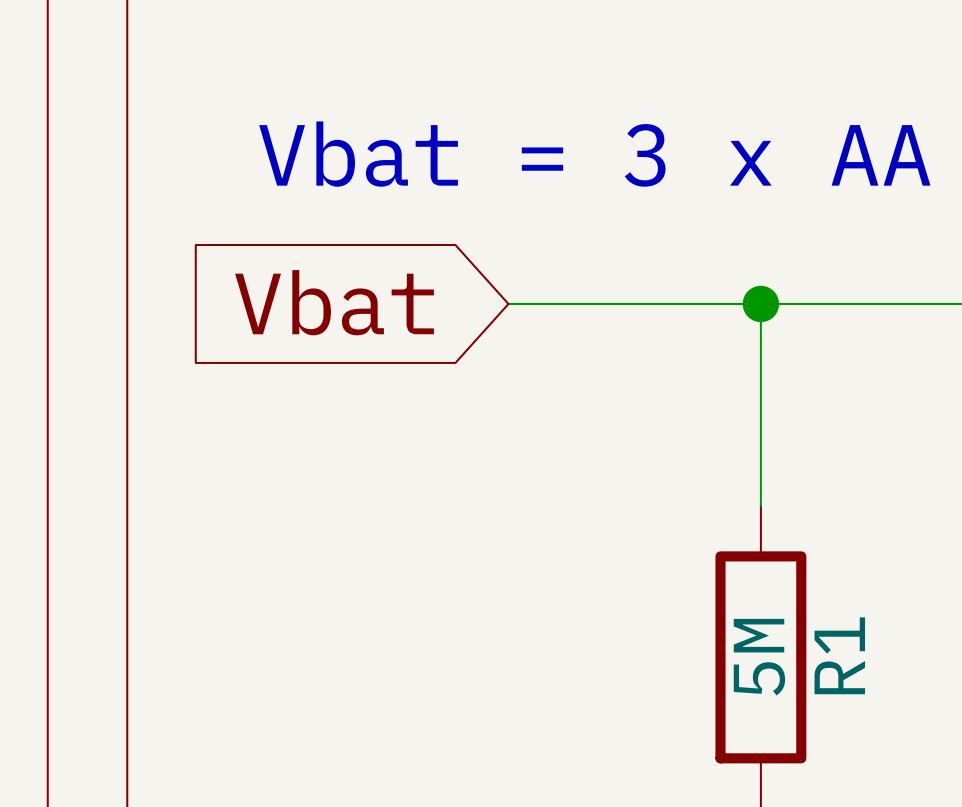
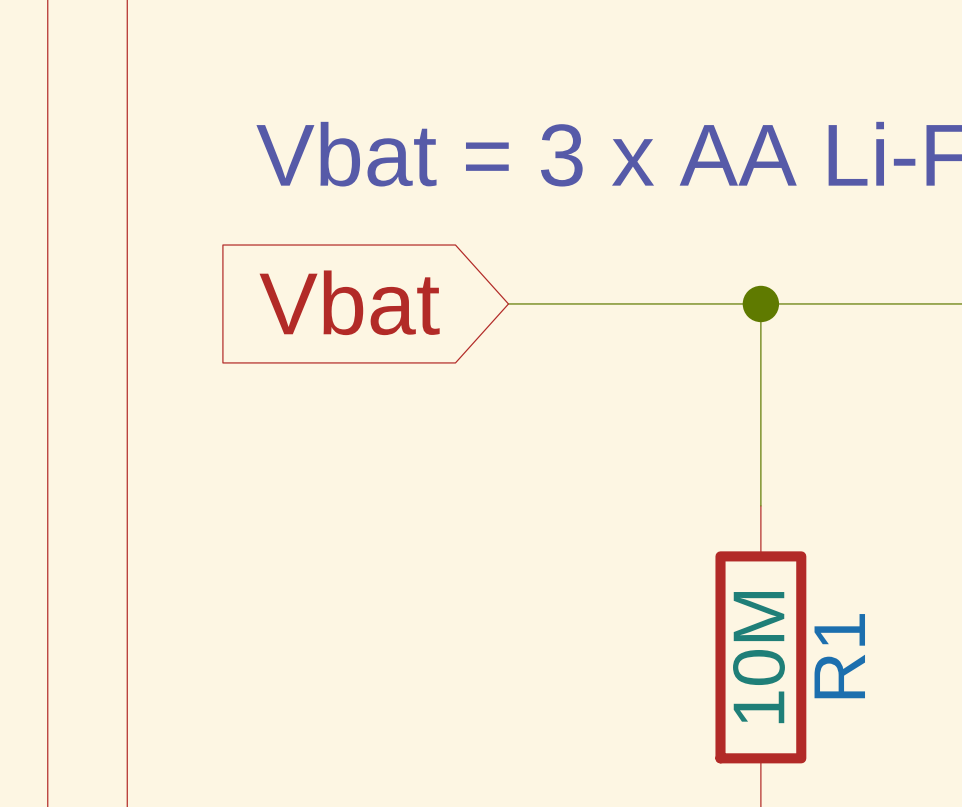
R1 value: 5M (759, 657) -> 10M (758, 657)

